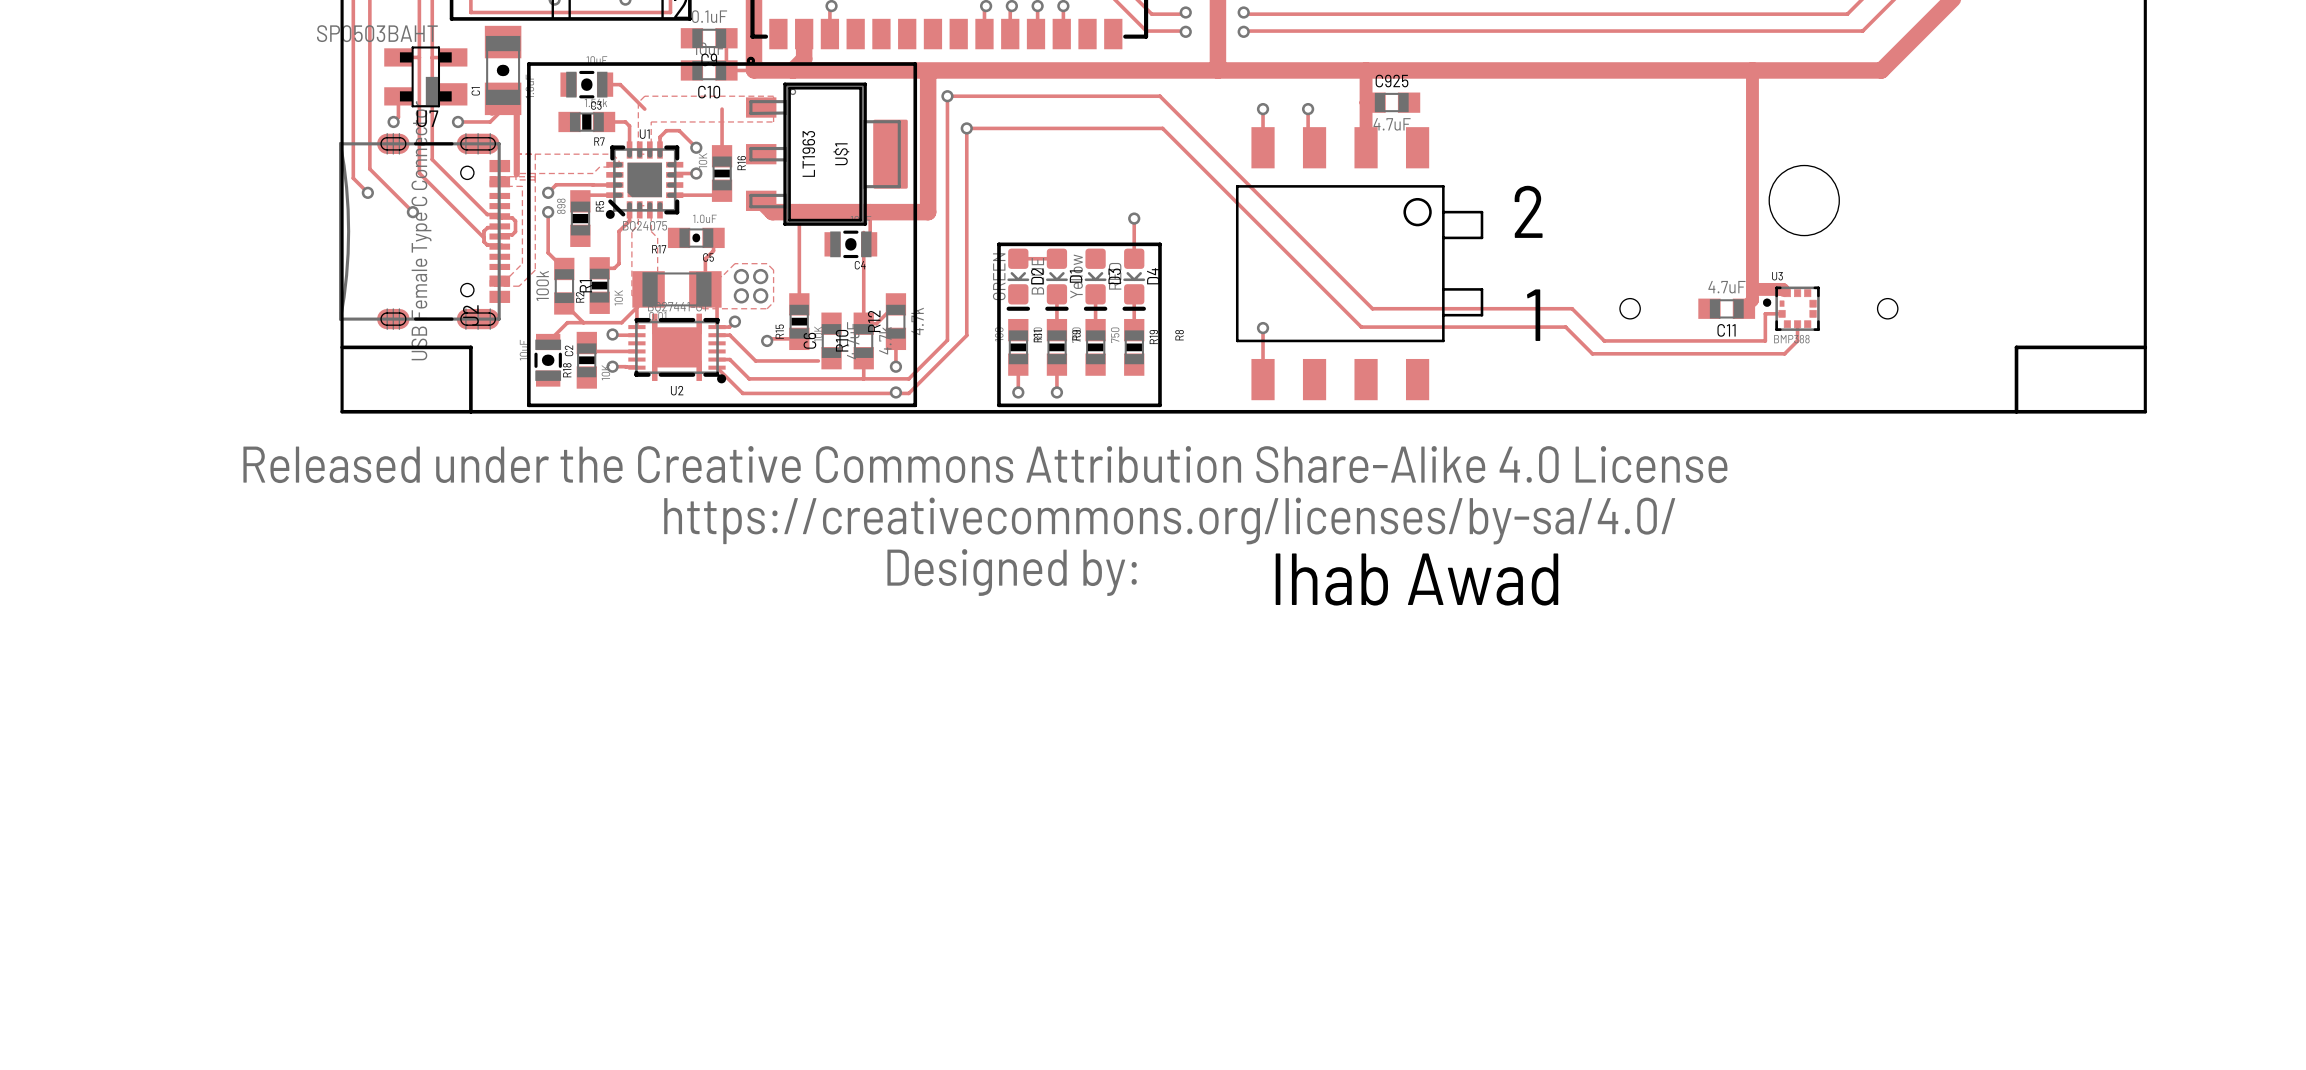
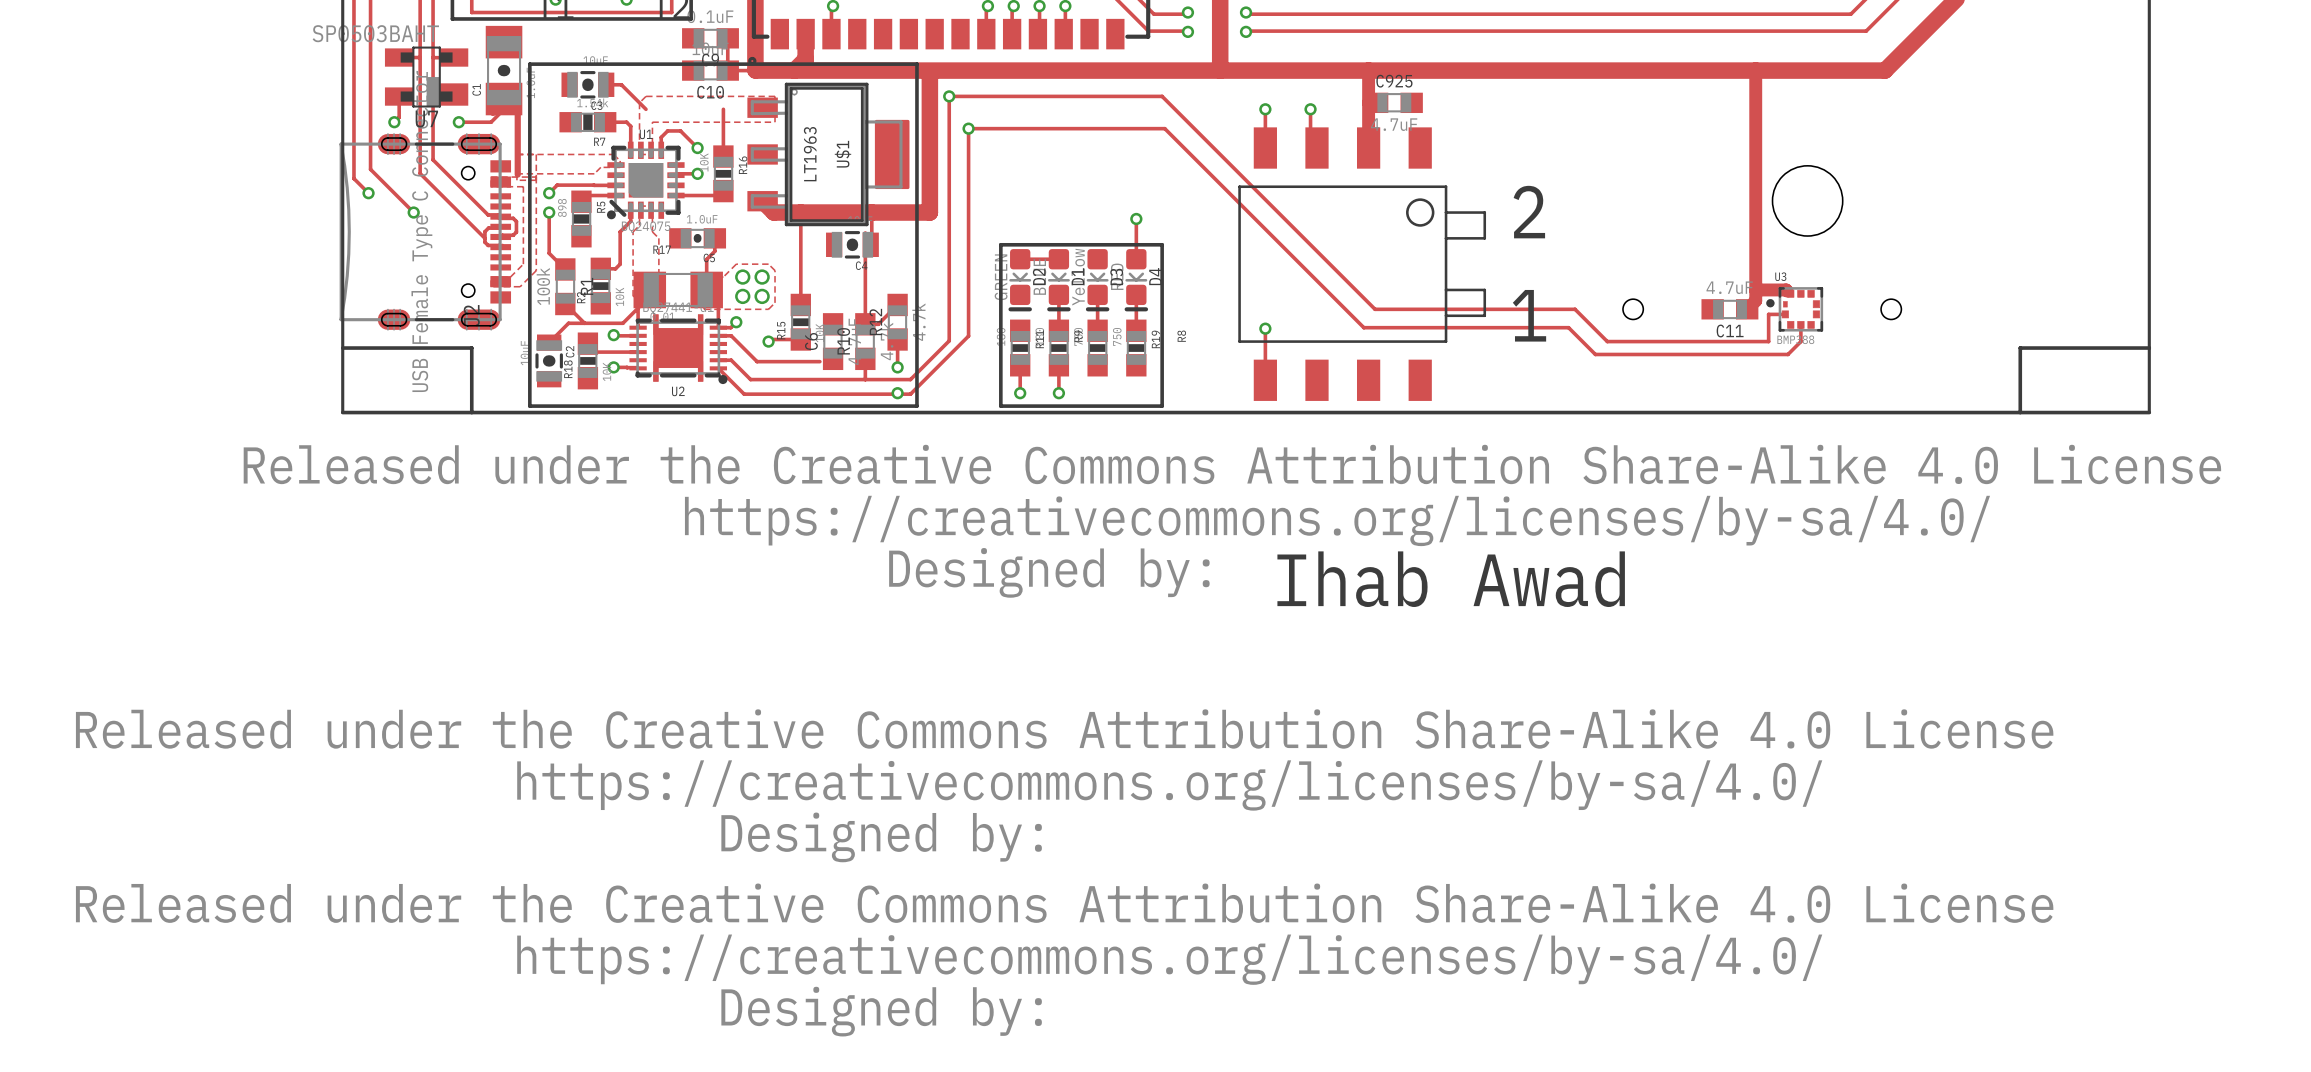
drawing: none -> [75, 709, 2054, 1037]

